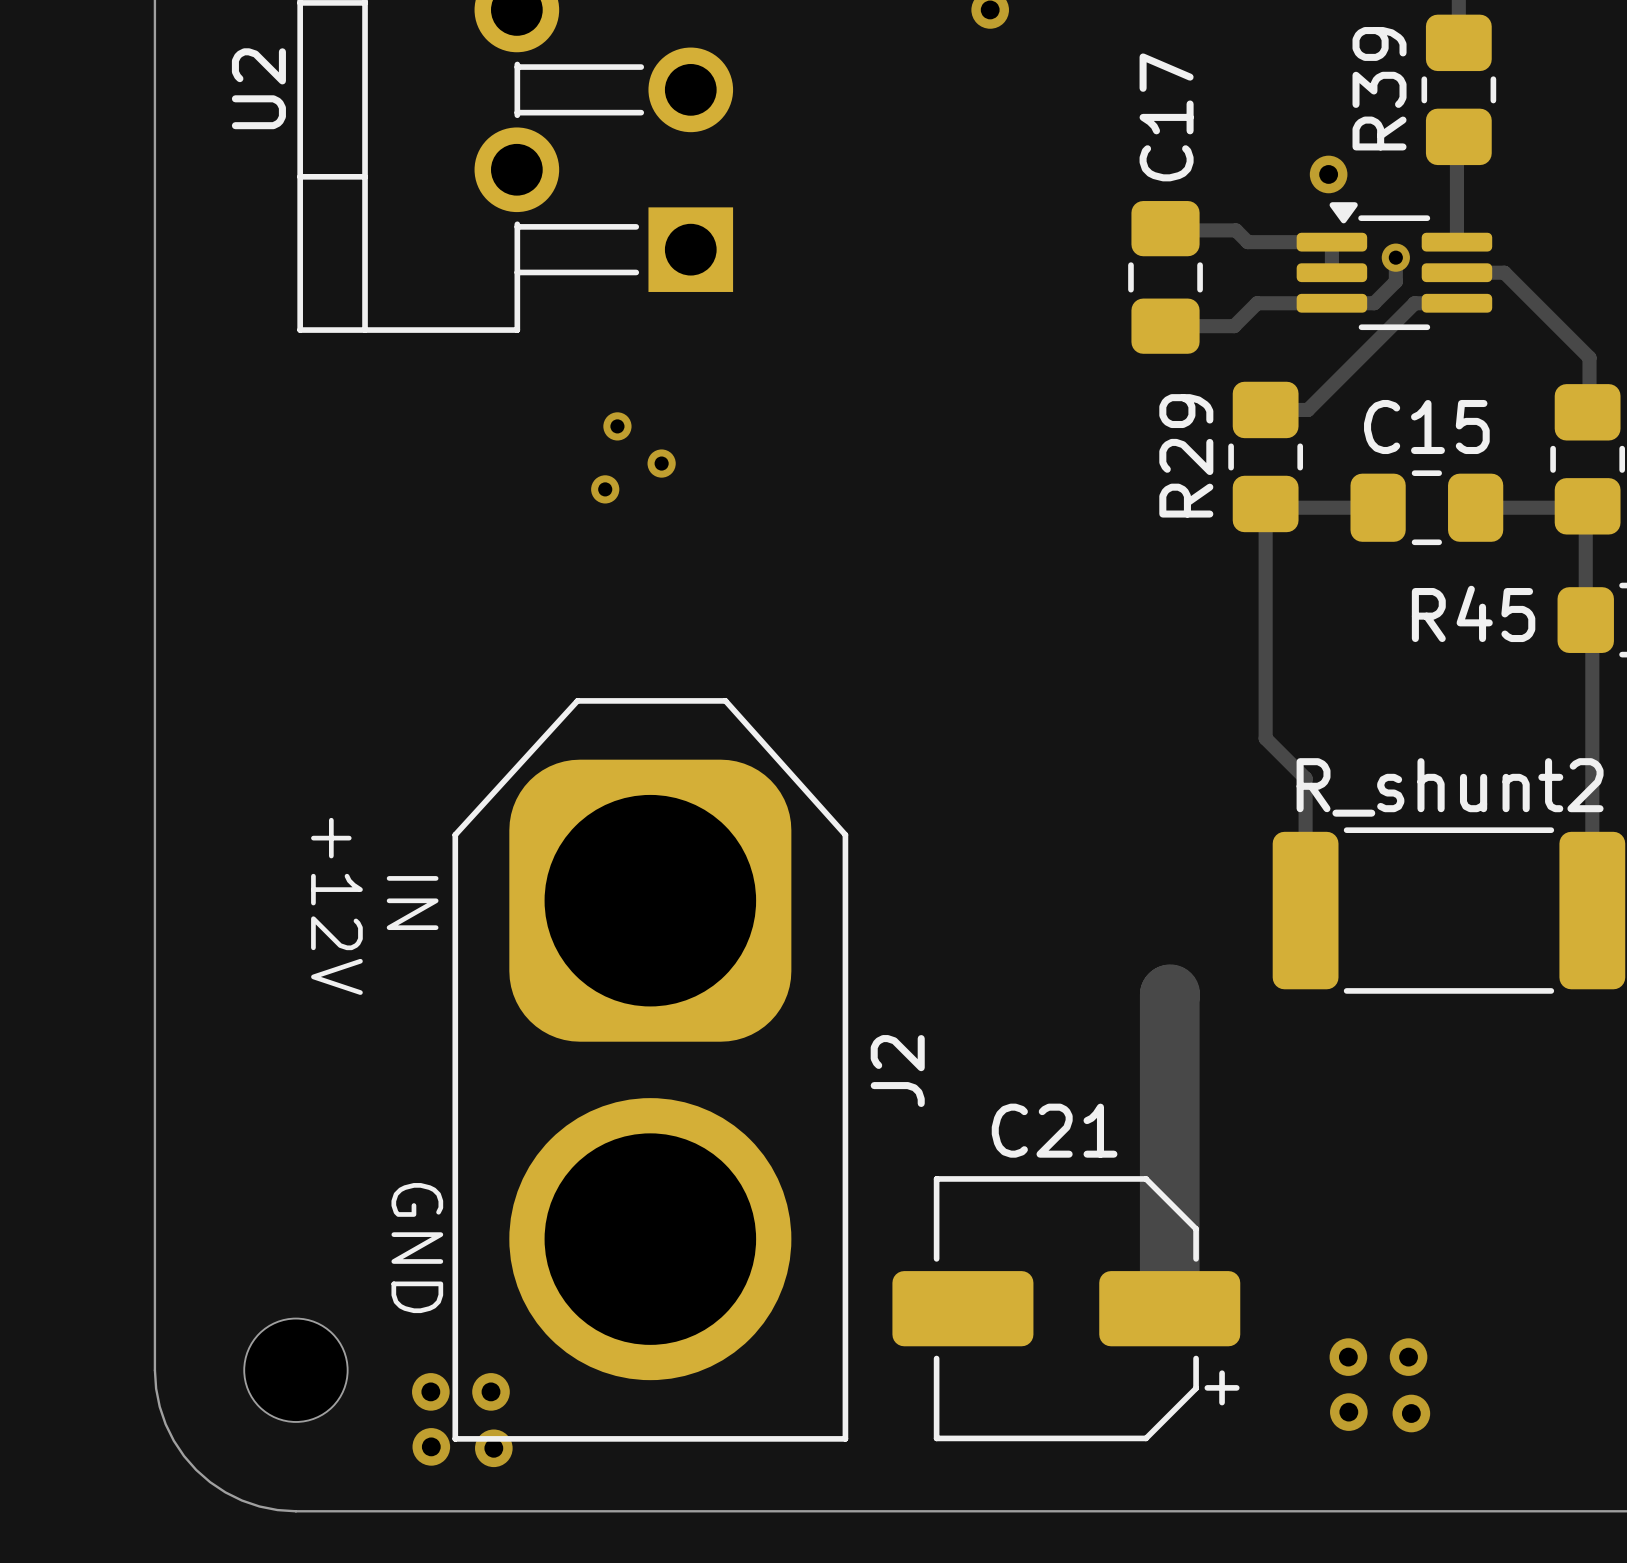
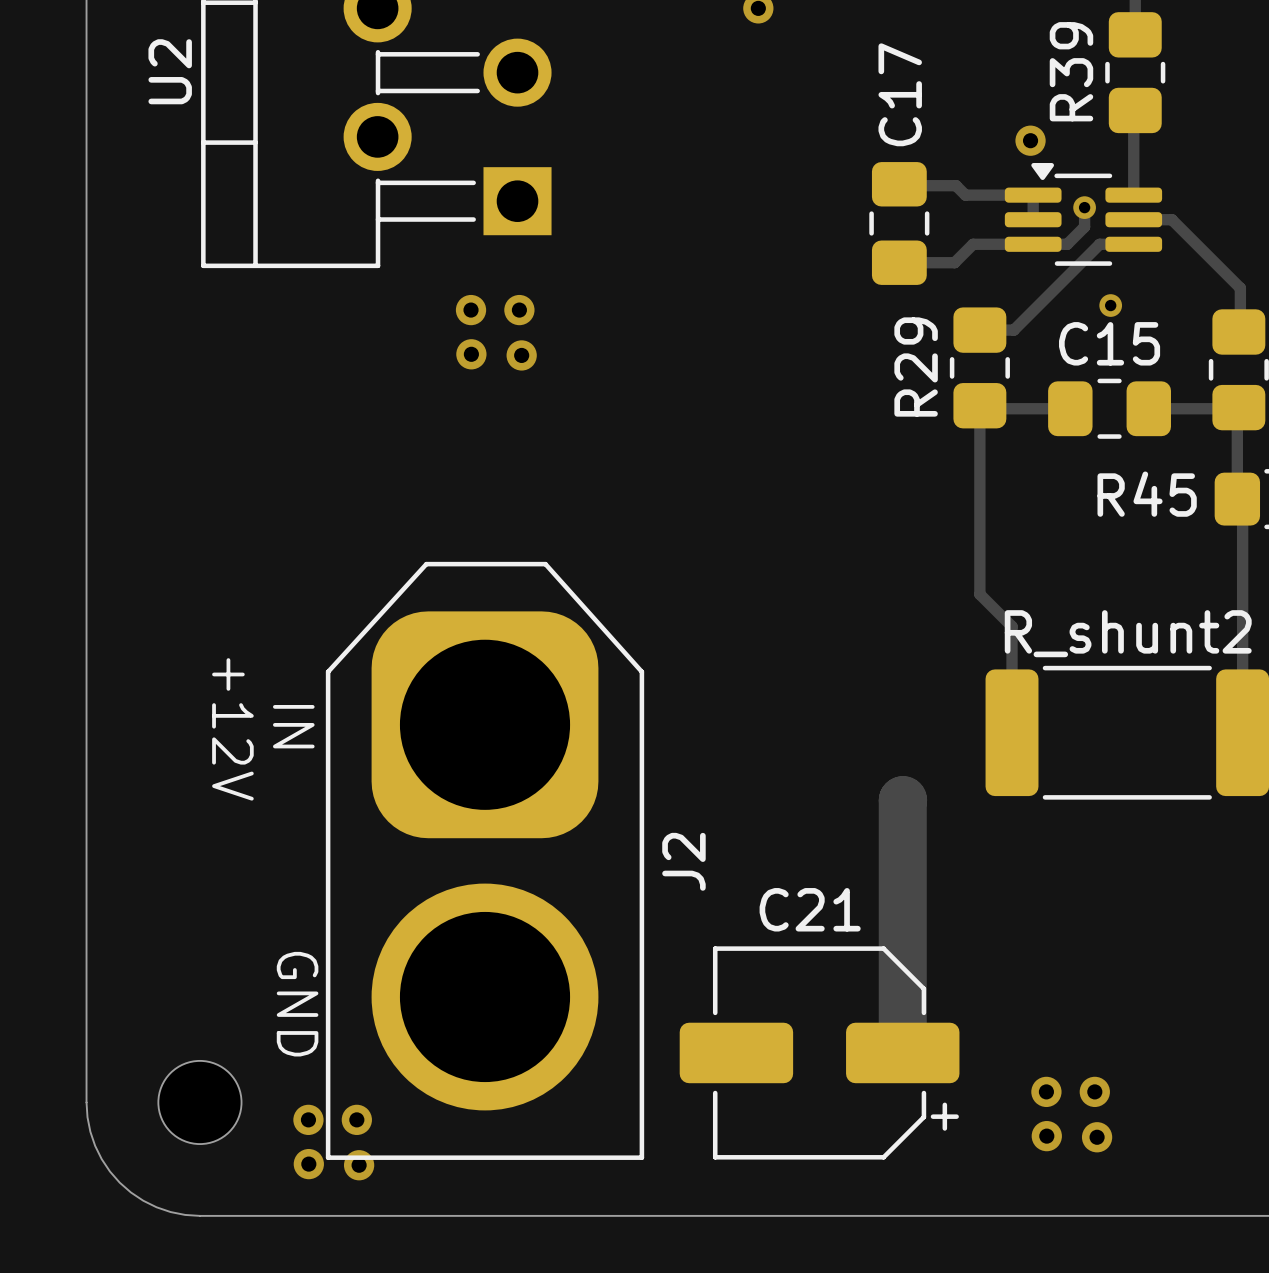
via: none -> (1110, 305)
via: none -> (471, 310)
via: none -> (519, 310)
via: (617, 426) -> none
via: none -> (471, 354)
via: none -> (521, 355)
via: (661, 463) -> none
via: (605, 489) -> none

